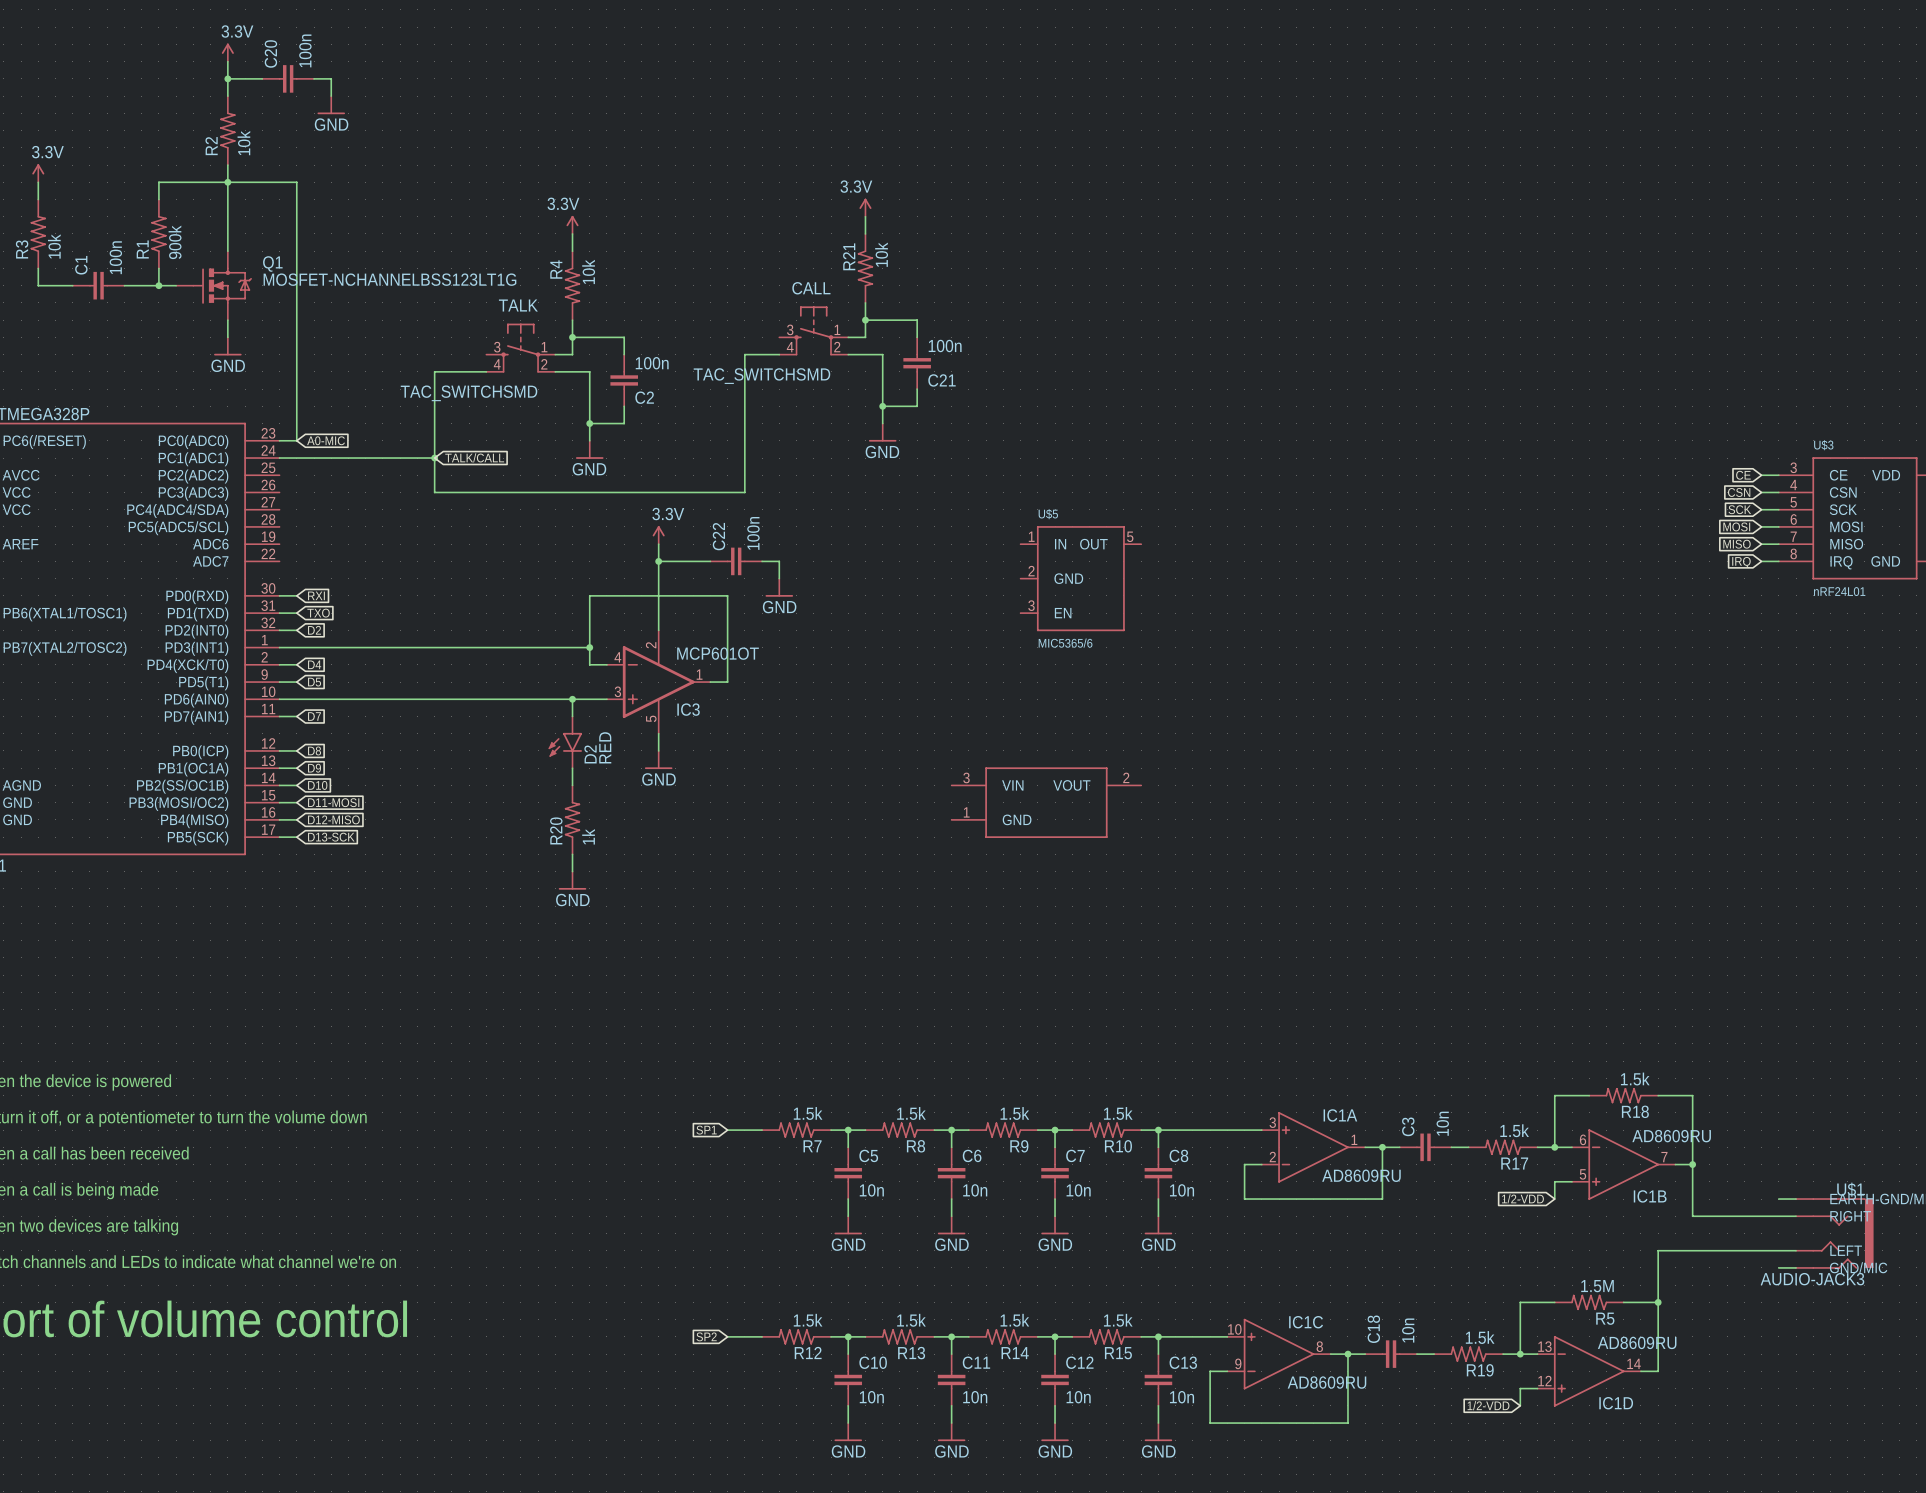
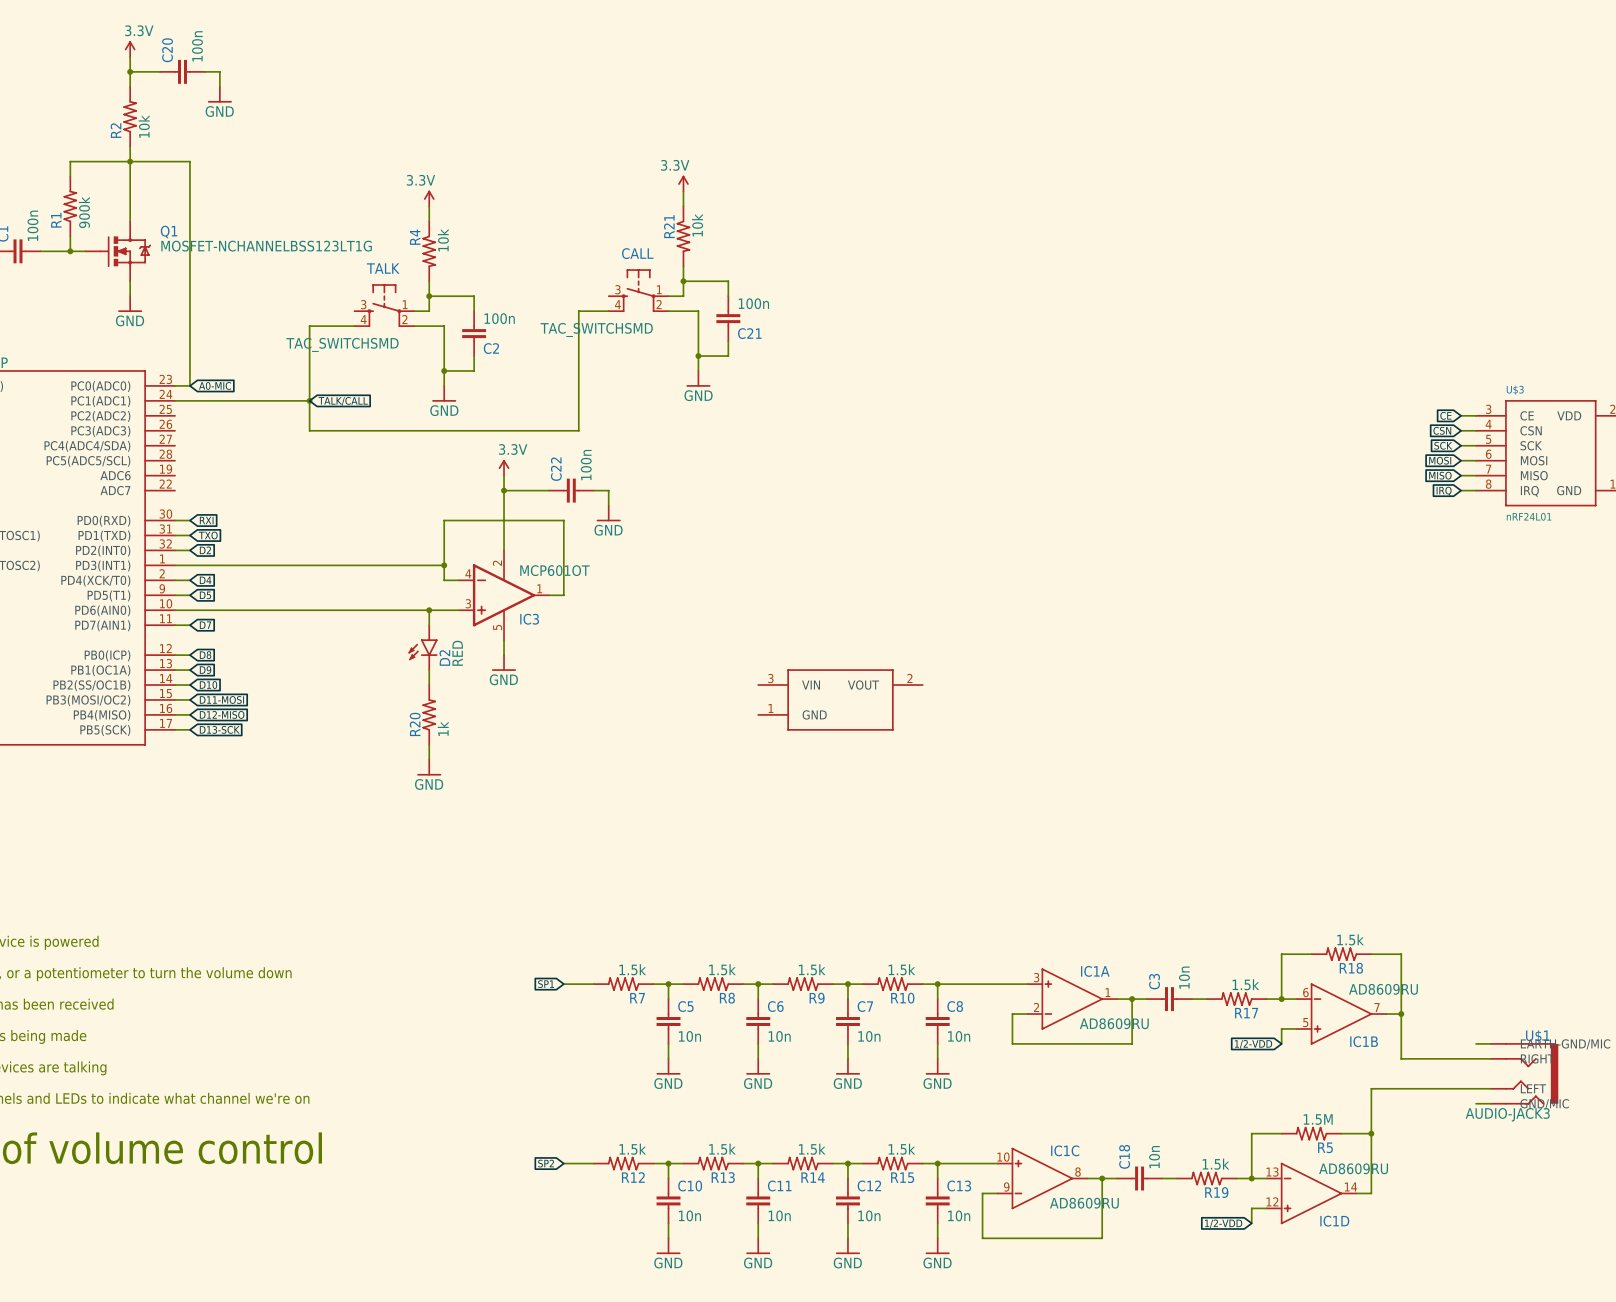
U$5: (1080, 578) -> none

